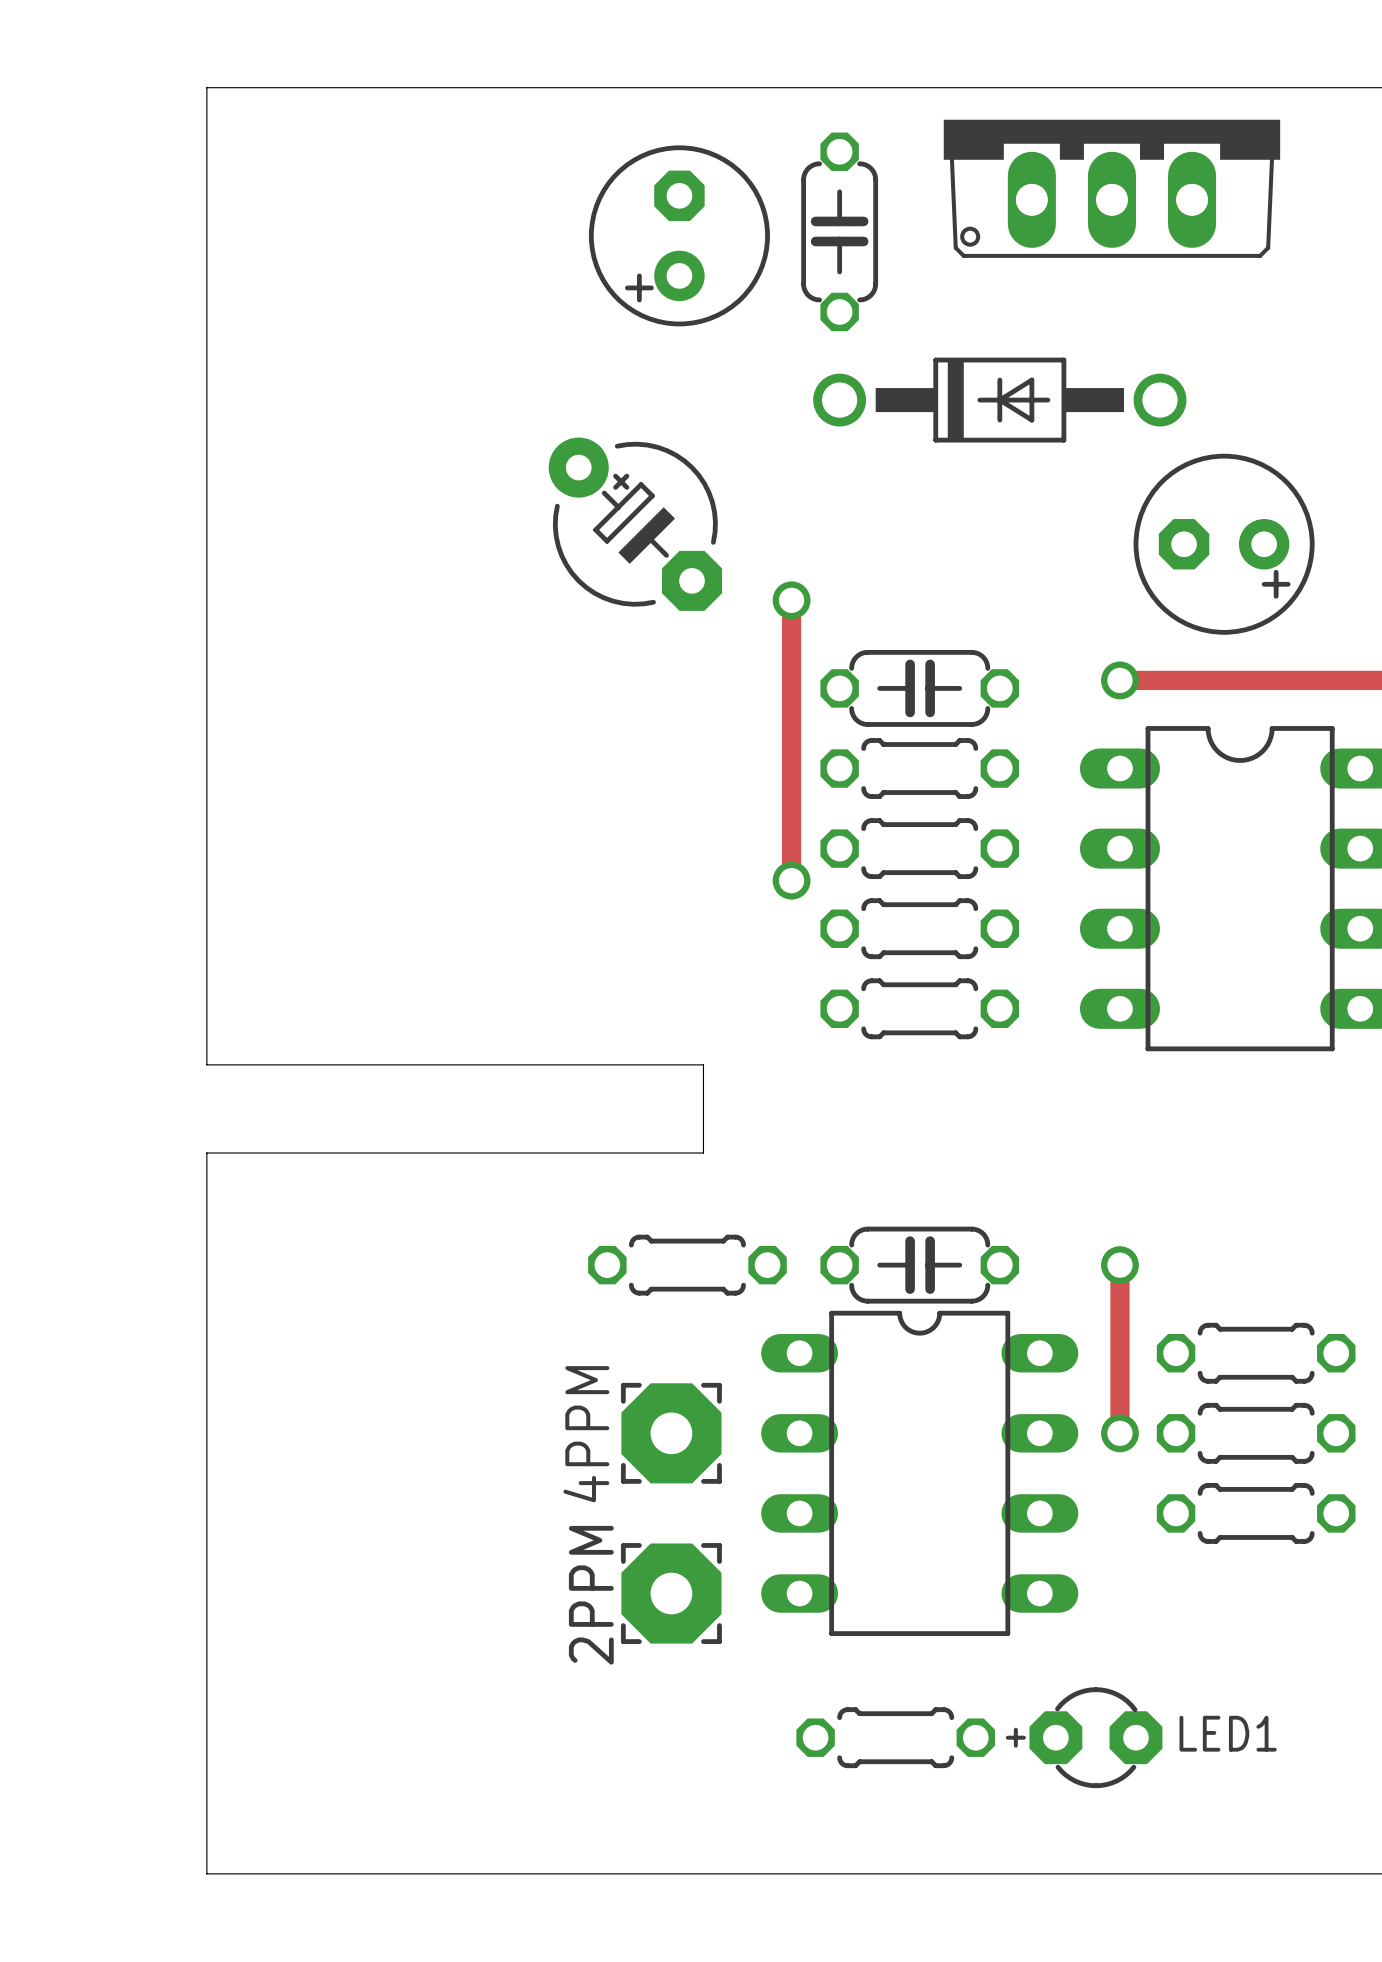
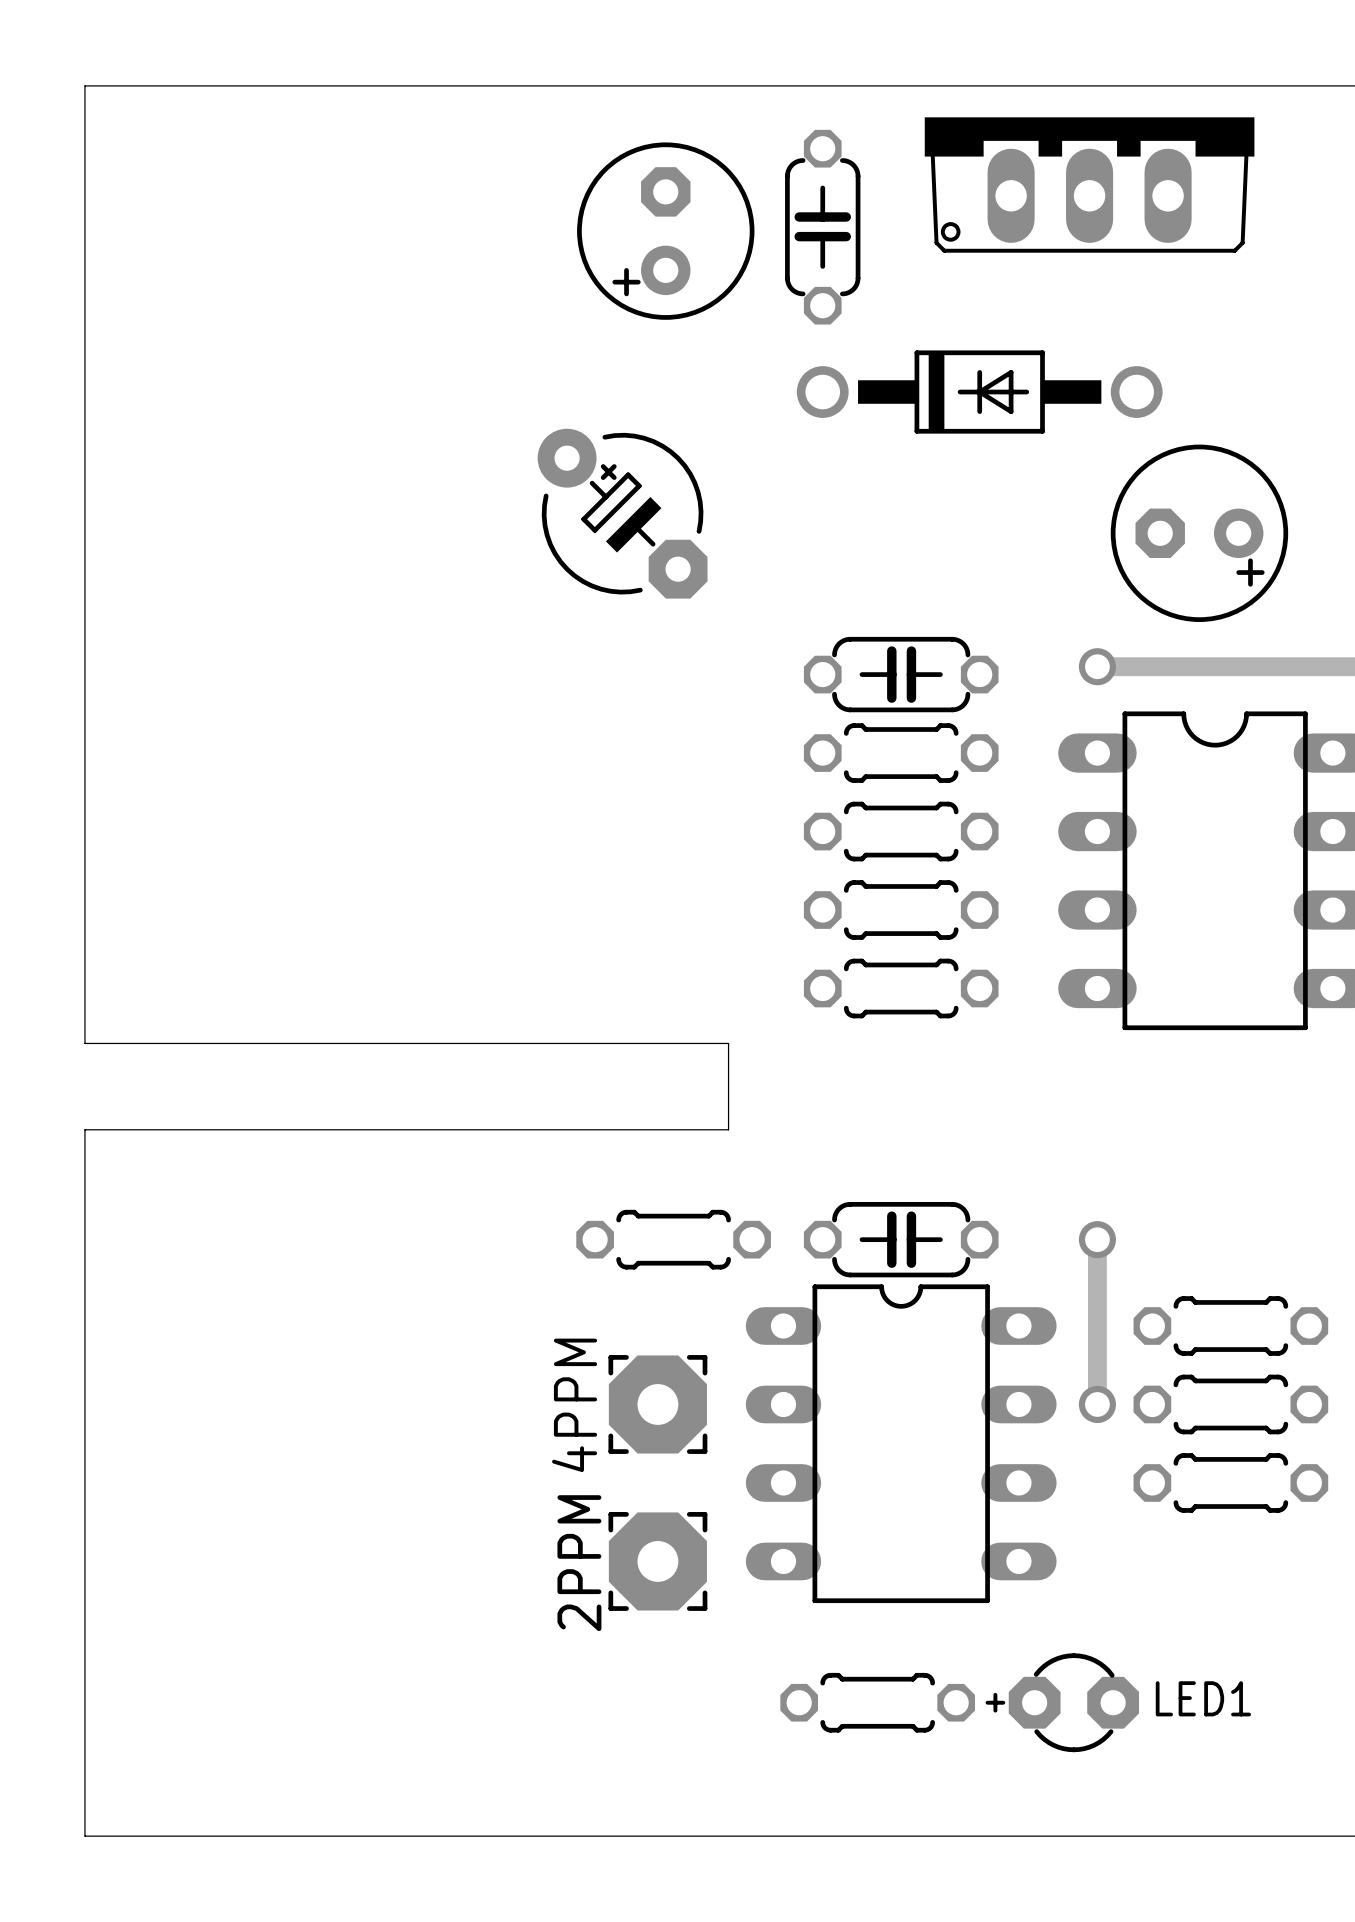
board edge: (206, 87) (206, 1064) -> (202, 85) (84, 85) (84, 1043) (202, 1043)
track: (791, 600) (791, 880) -> none
via: (791, 600) -> none
via: (791, 880) -> none
board edge: (703, 1064) (703, 1152) -> (689, 1043) (728, 1043) (728, 1129) (689, 1129)
board edge: (206, 1152) (206, 1873) -> (202, 1129) (84, 1129) (84, 1836) (202, 1836)

